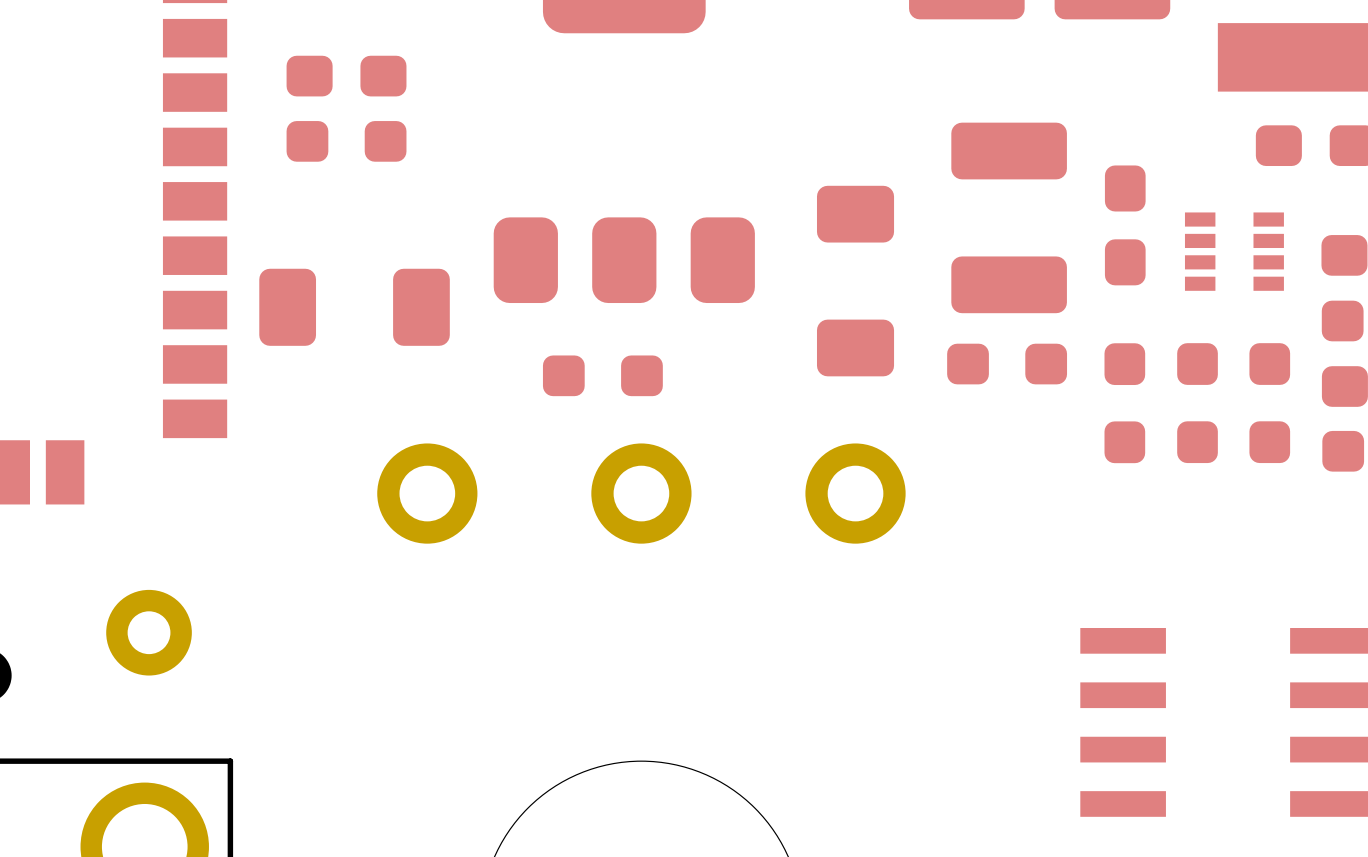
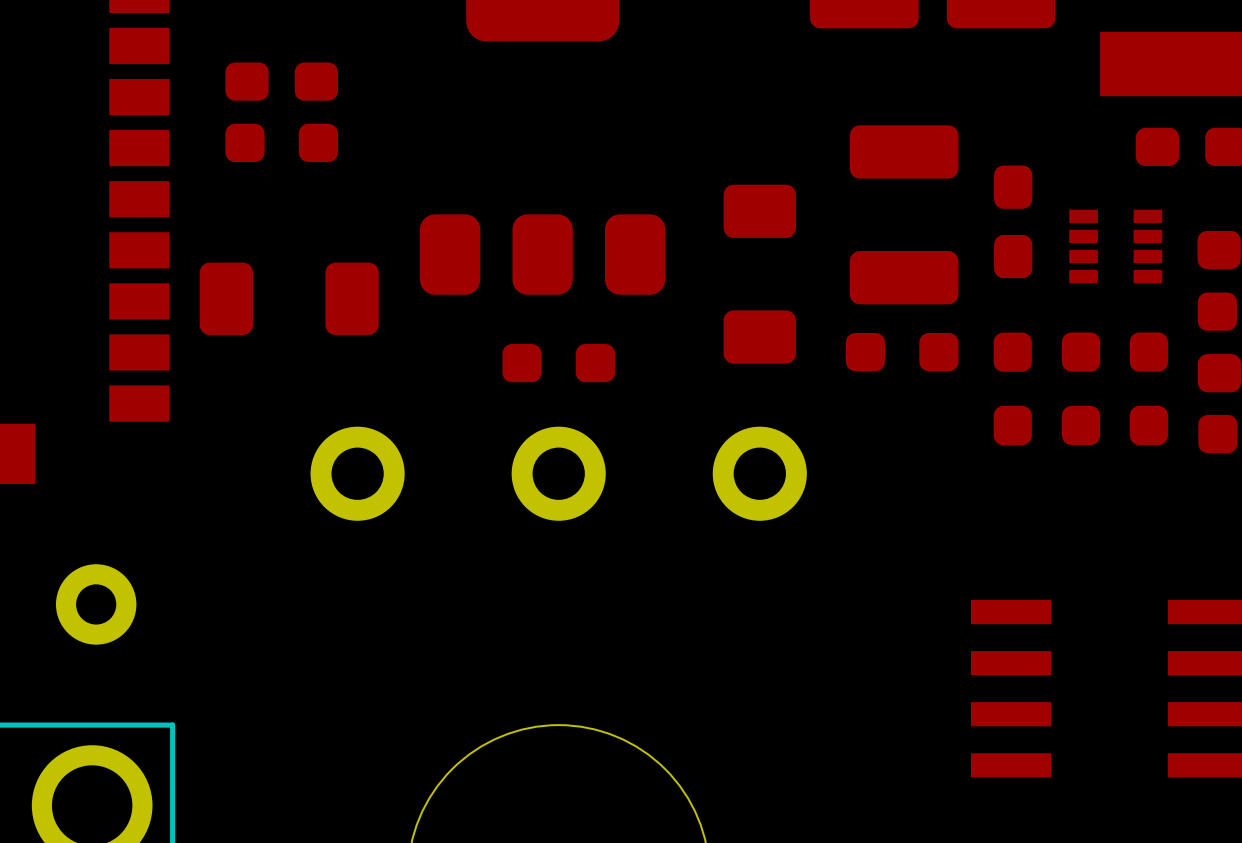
part position: (602, 375) -> (558, 363)

